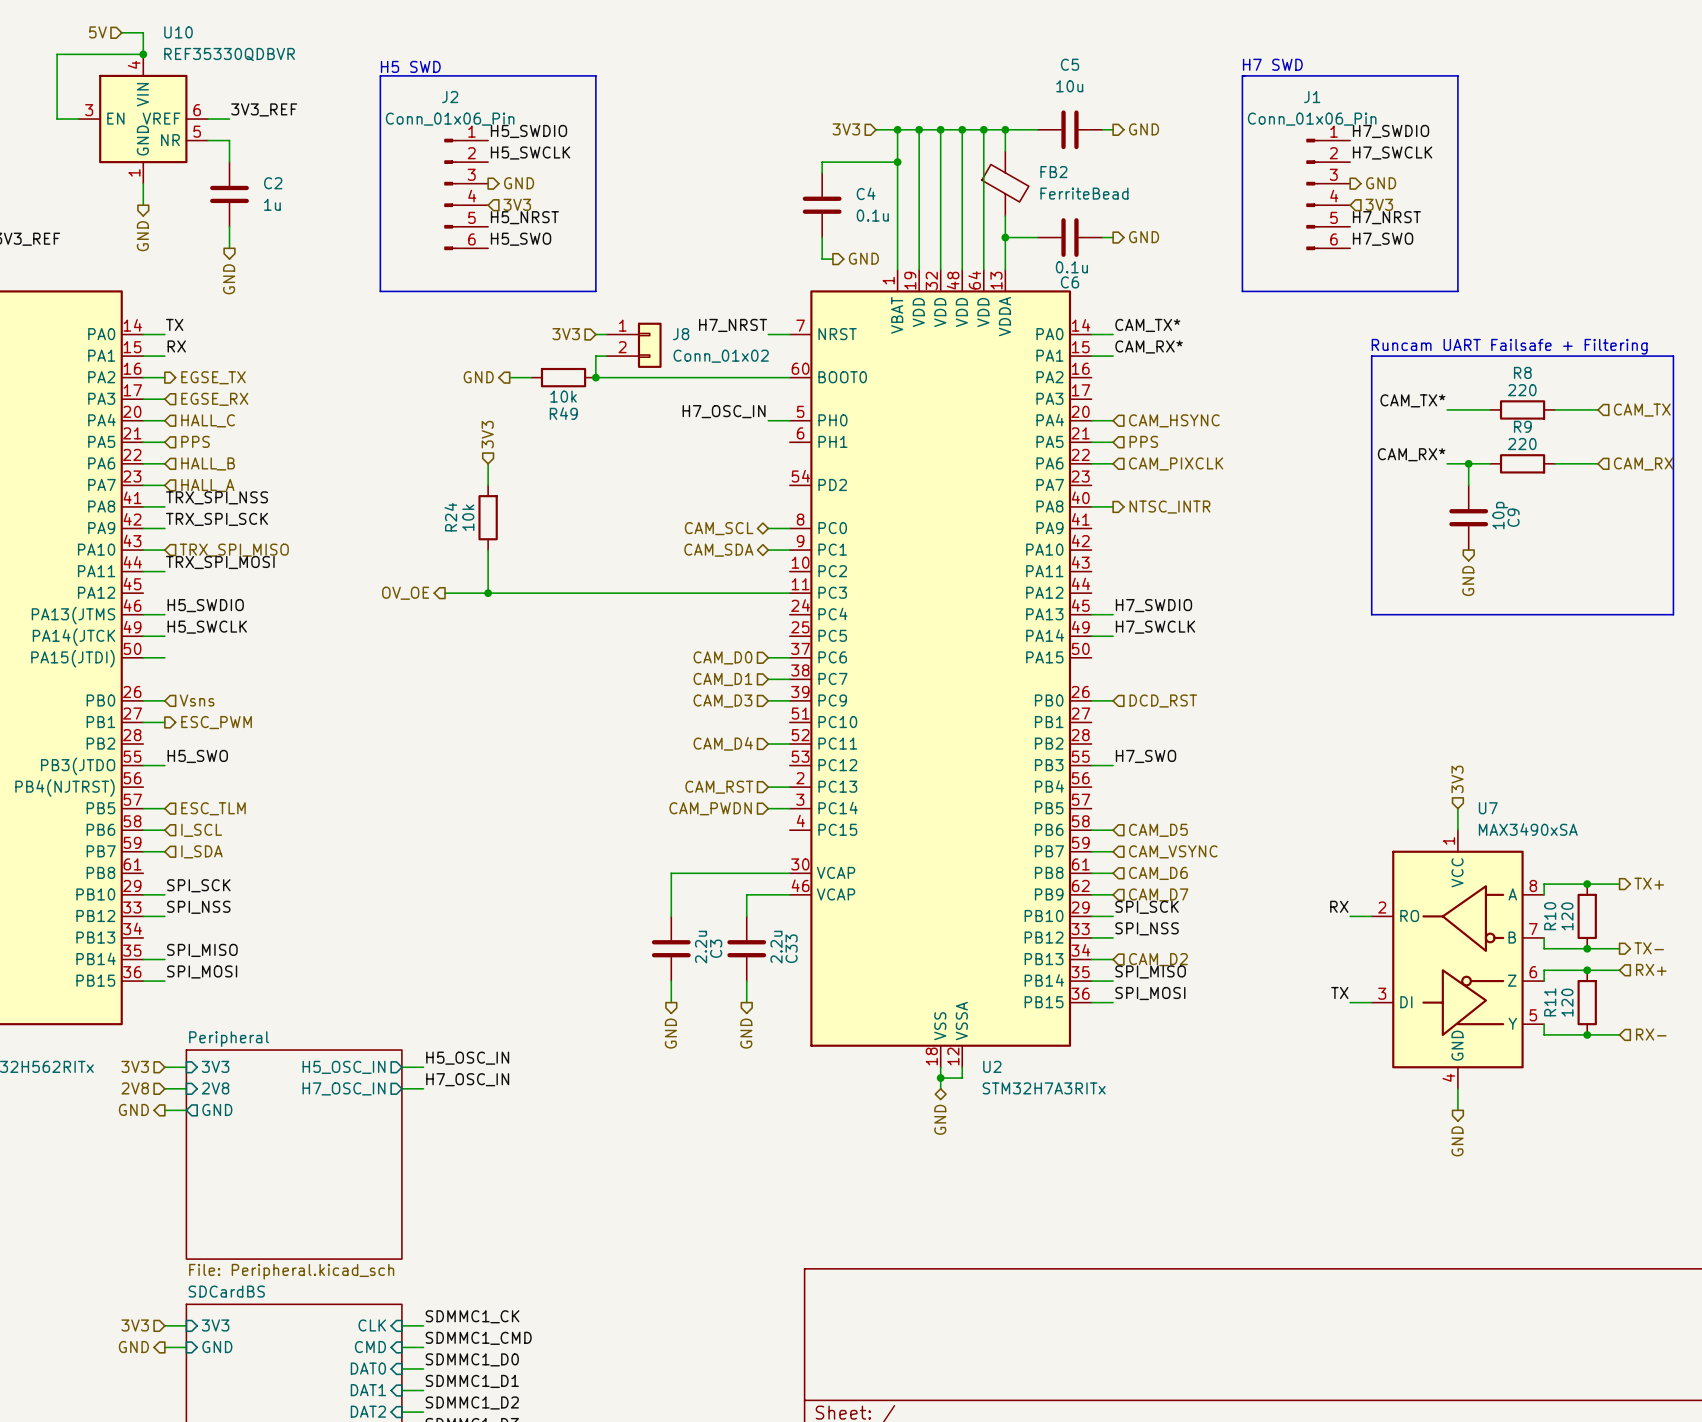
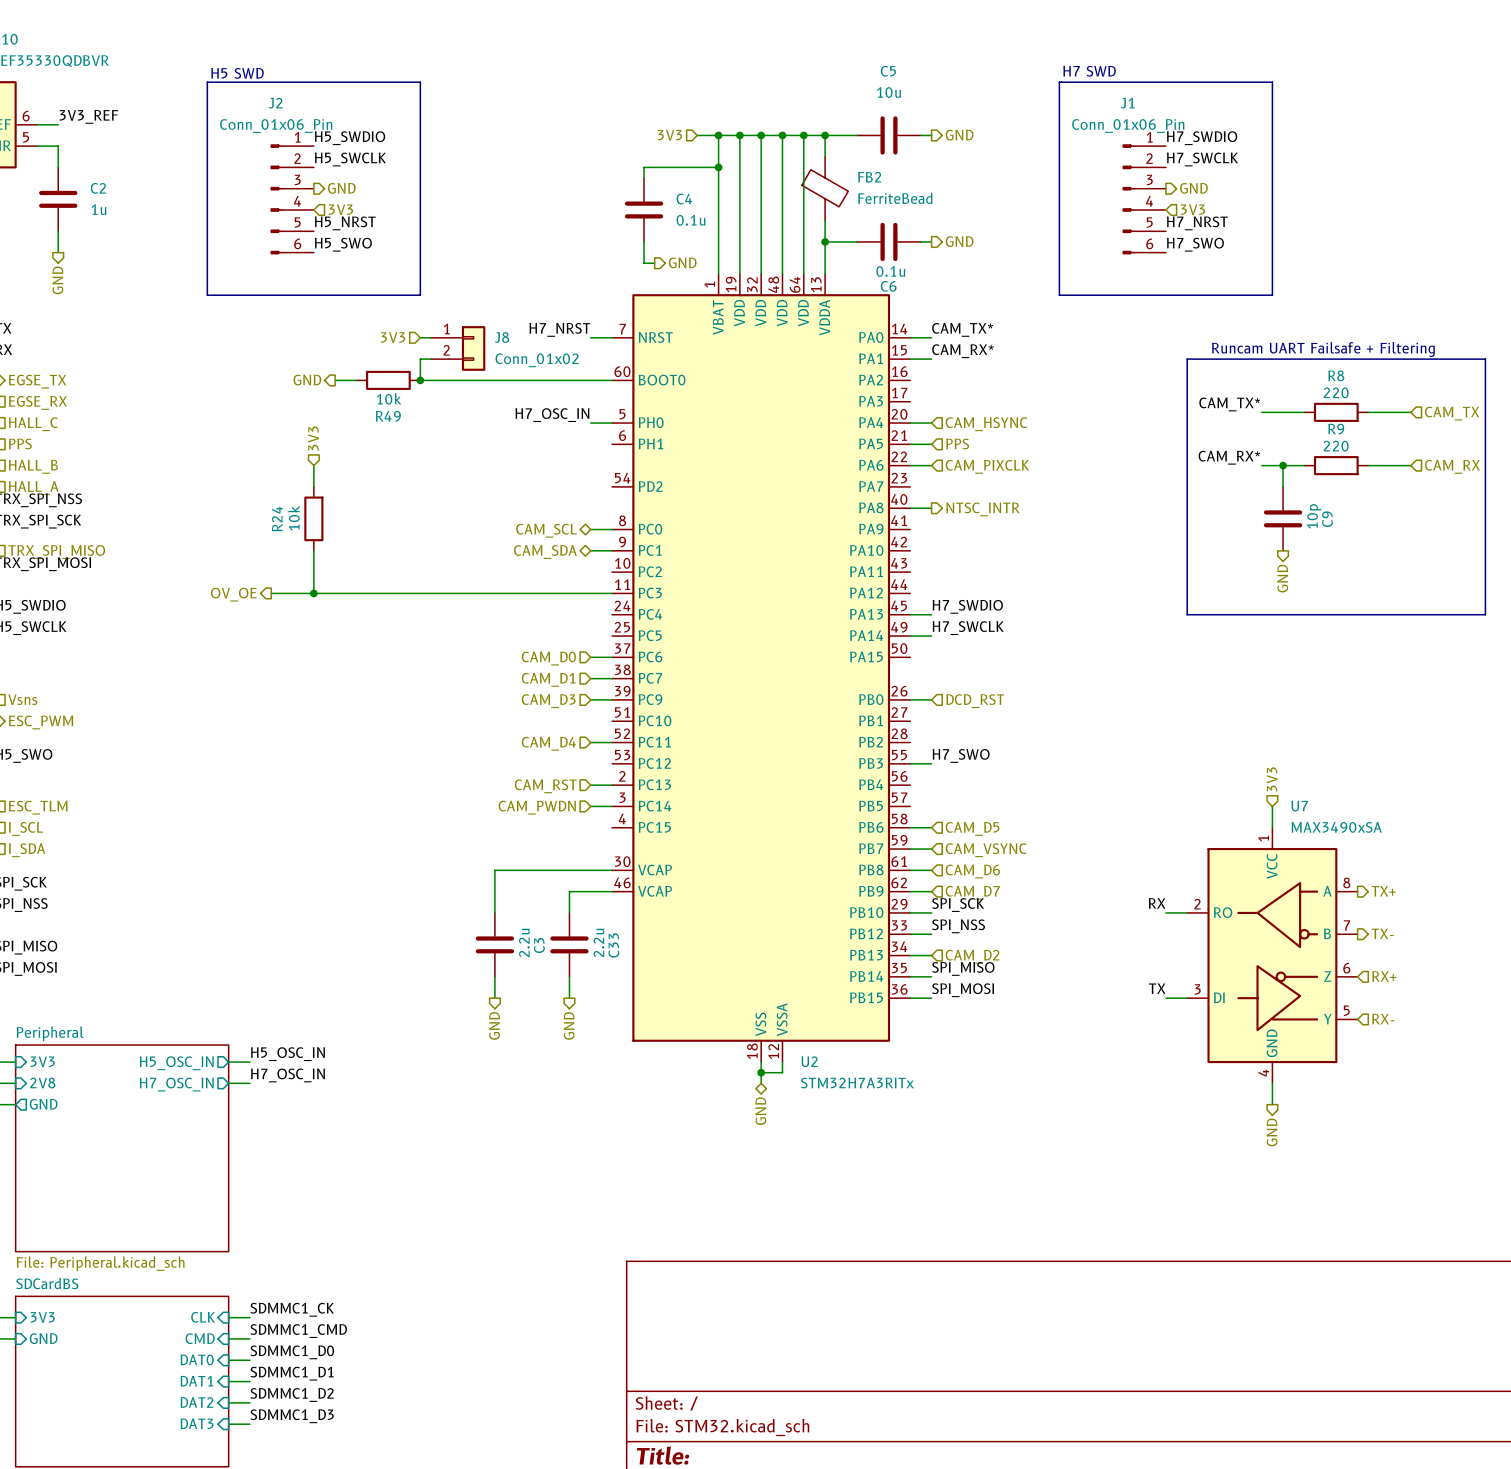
hierarchical label position: TX+ (1649, 883) -> TX+ (1383, 891)
junction: (1587, 884) -> none
wire: (1619, 884) (1544, 884) (1544, 894) -> none
R10: 120 (1587, 916) -> none
wire: (1544, 937) (1544, 948) (1619, 948) -> none
junction: (1587, 948) -> none
hierarchical label position: TX- (1649, 948) -> TX- (1382, 933)
hierarchical label position: RX+ (1651, 969) -> RX+ (1384, 976)
junction: (1587, 970) -> none
wire: (1619, 970) (1544, 970) (1544, 981) -> none
R11: 120 (1587, 1002) -> none
wire: (1544, 1024) (1544, 1034) (1619, 1034) -> none
junction: (1587, 1034) -> none
hierarchical label position: RX- (1651, 1034) -> RX- (1383, 1019)

